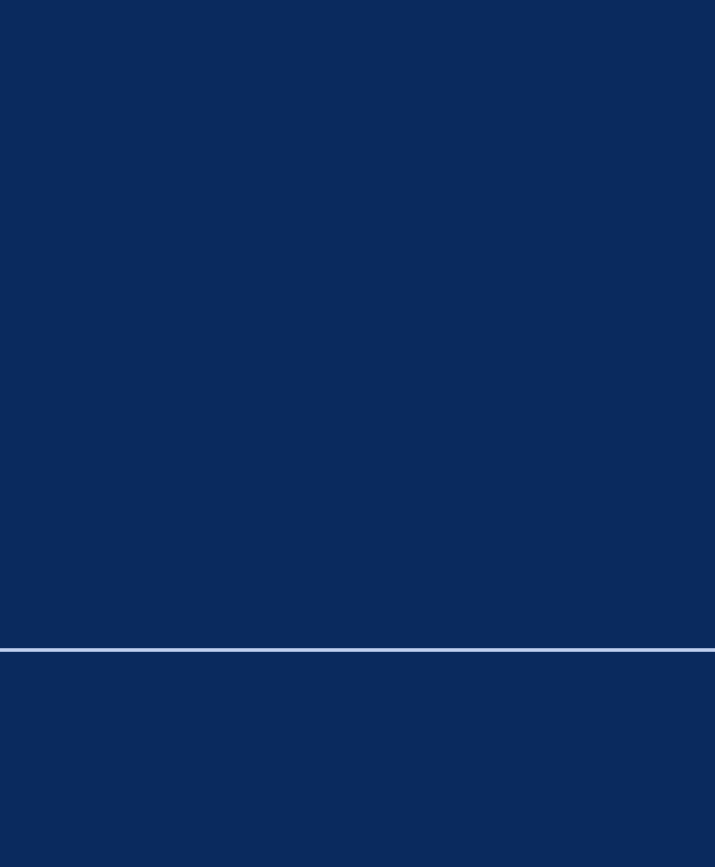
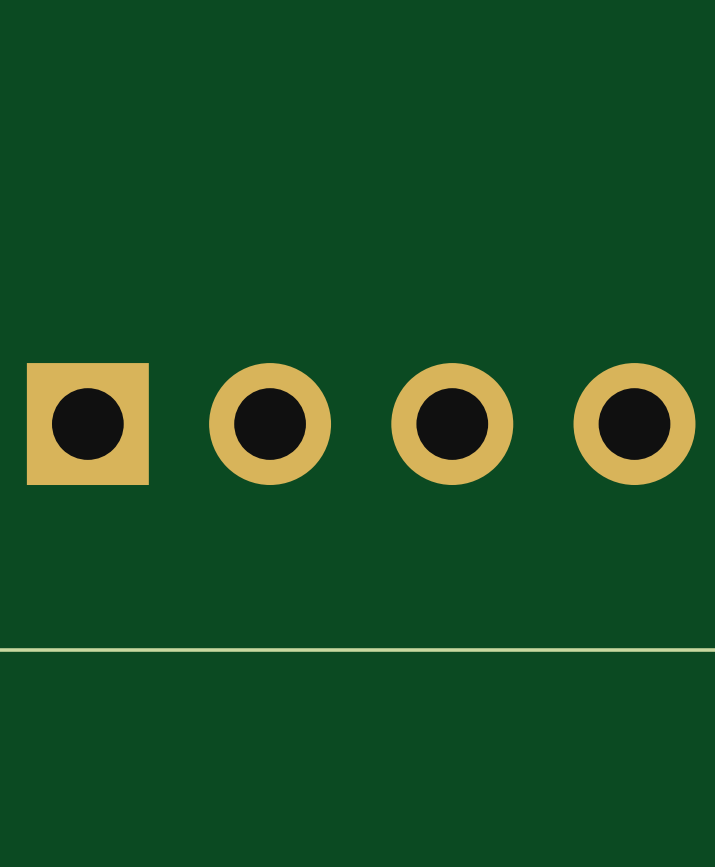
part: none -> (361, 424)

